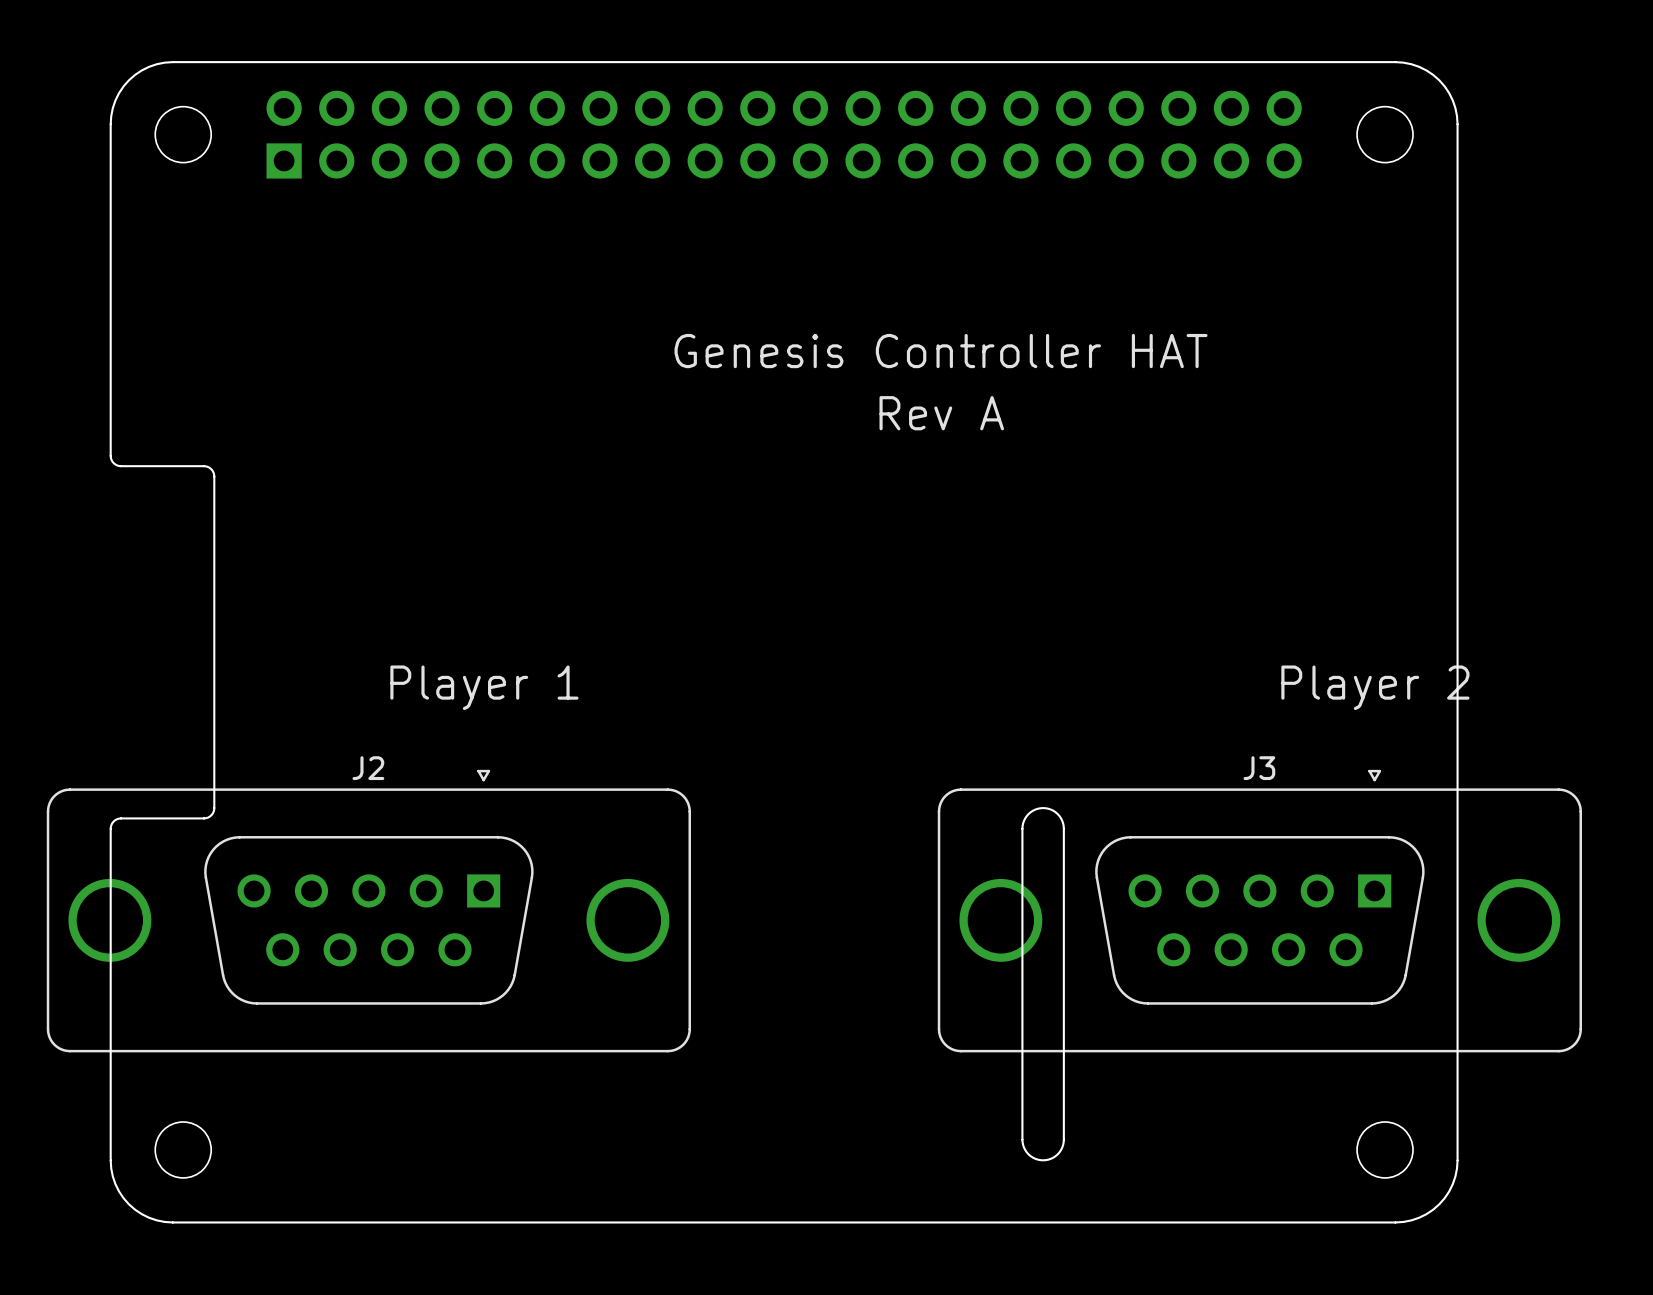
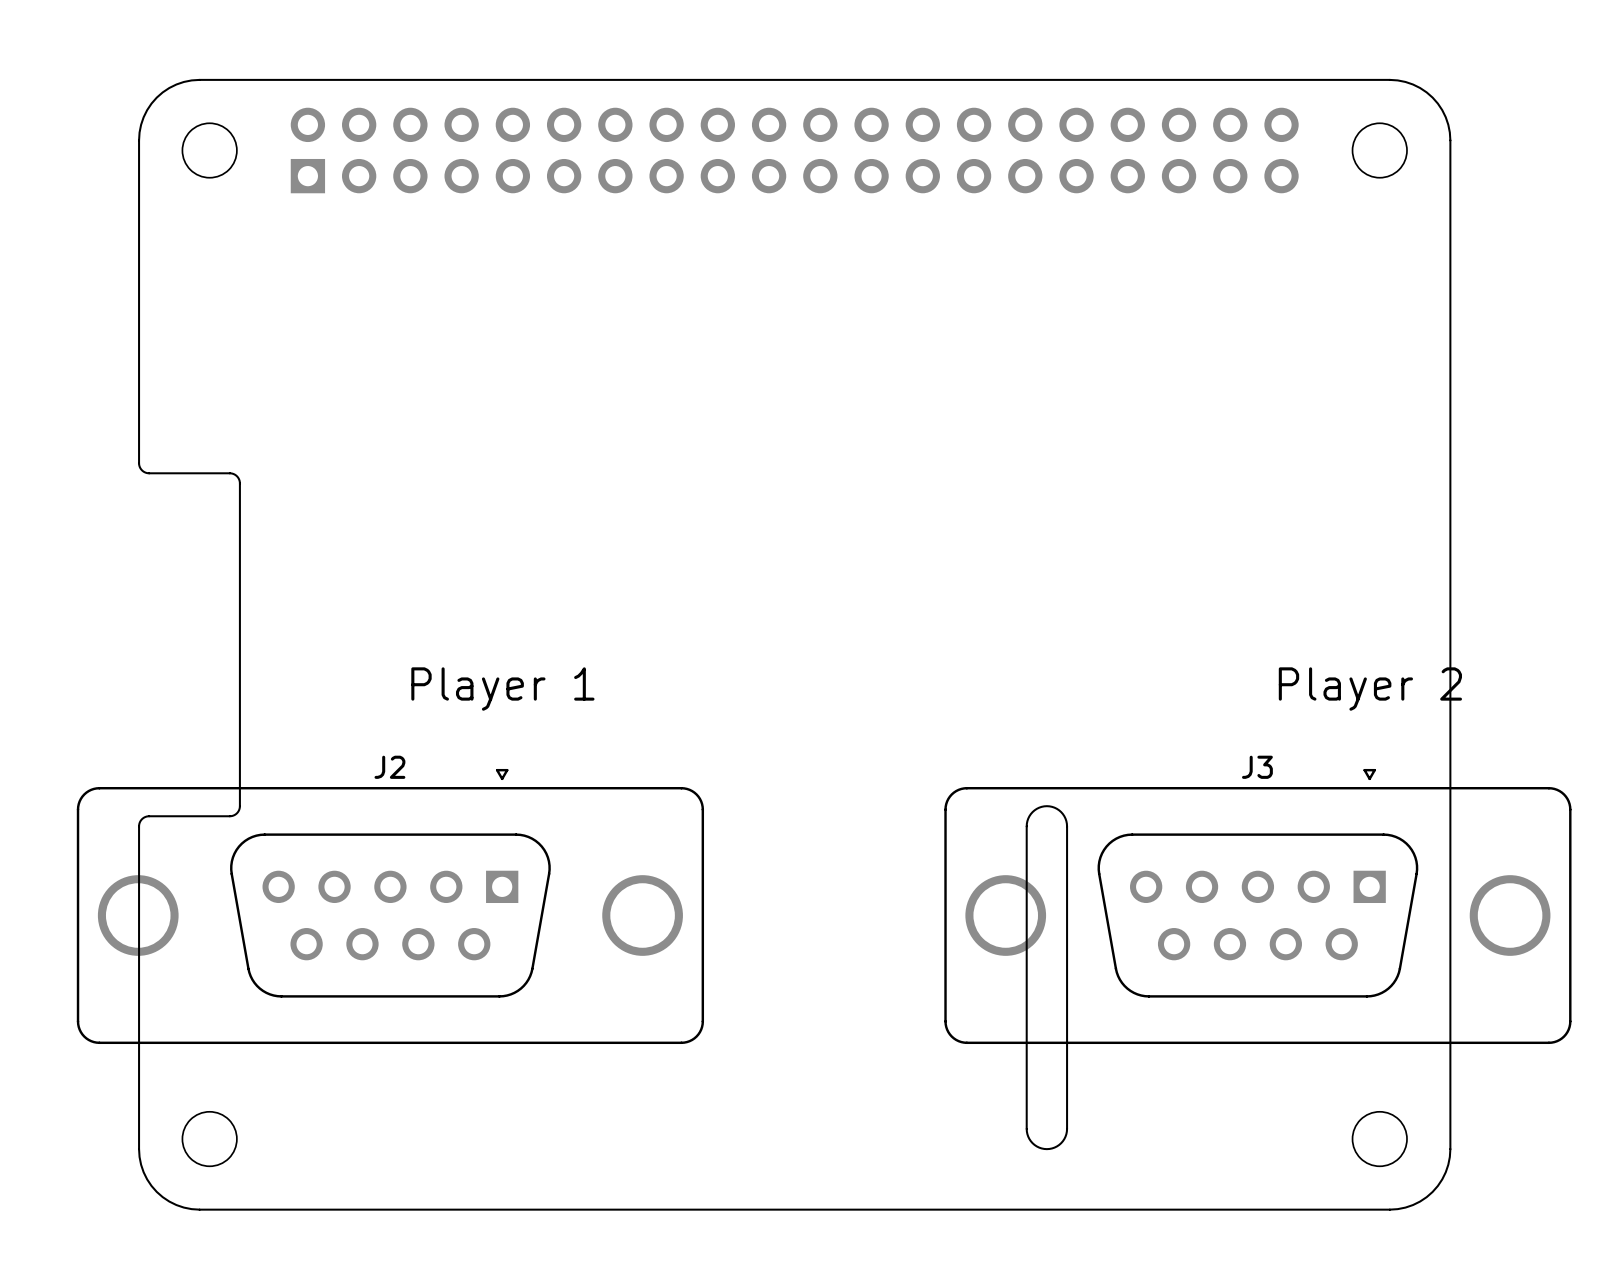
text: Genesis Controller HAT (941, 351) -> none
text: Rev A (941, 413) -> none

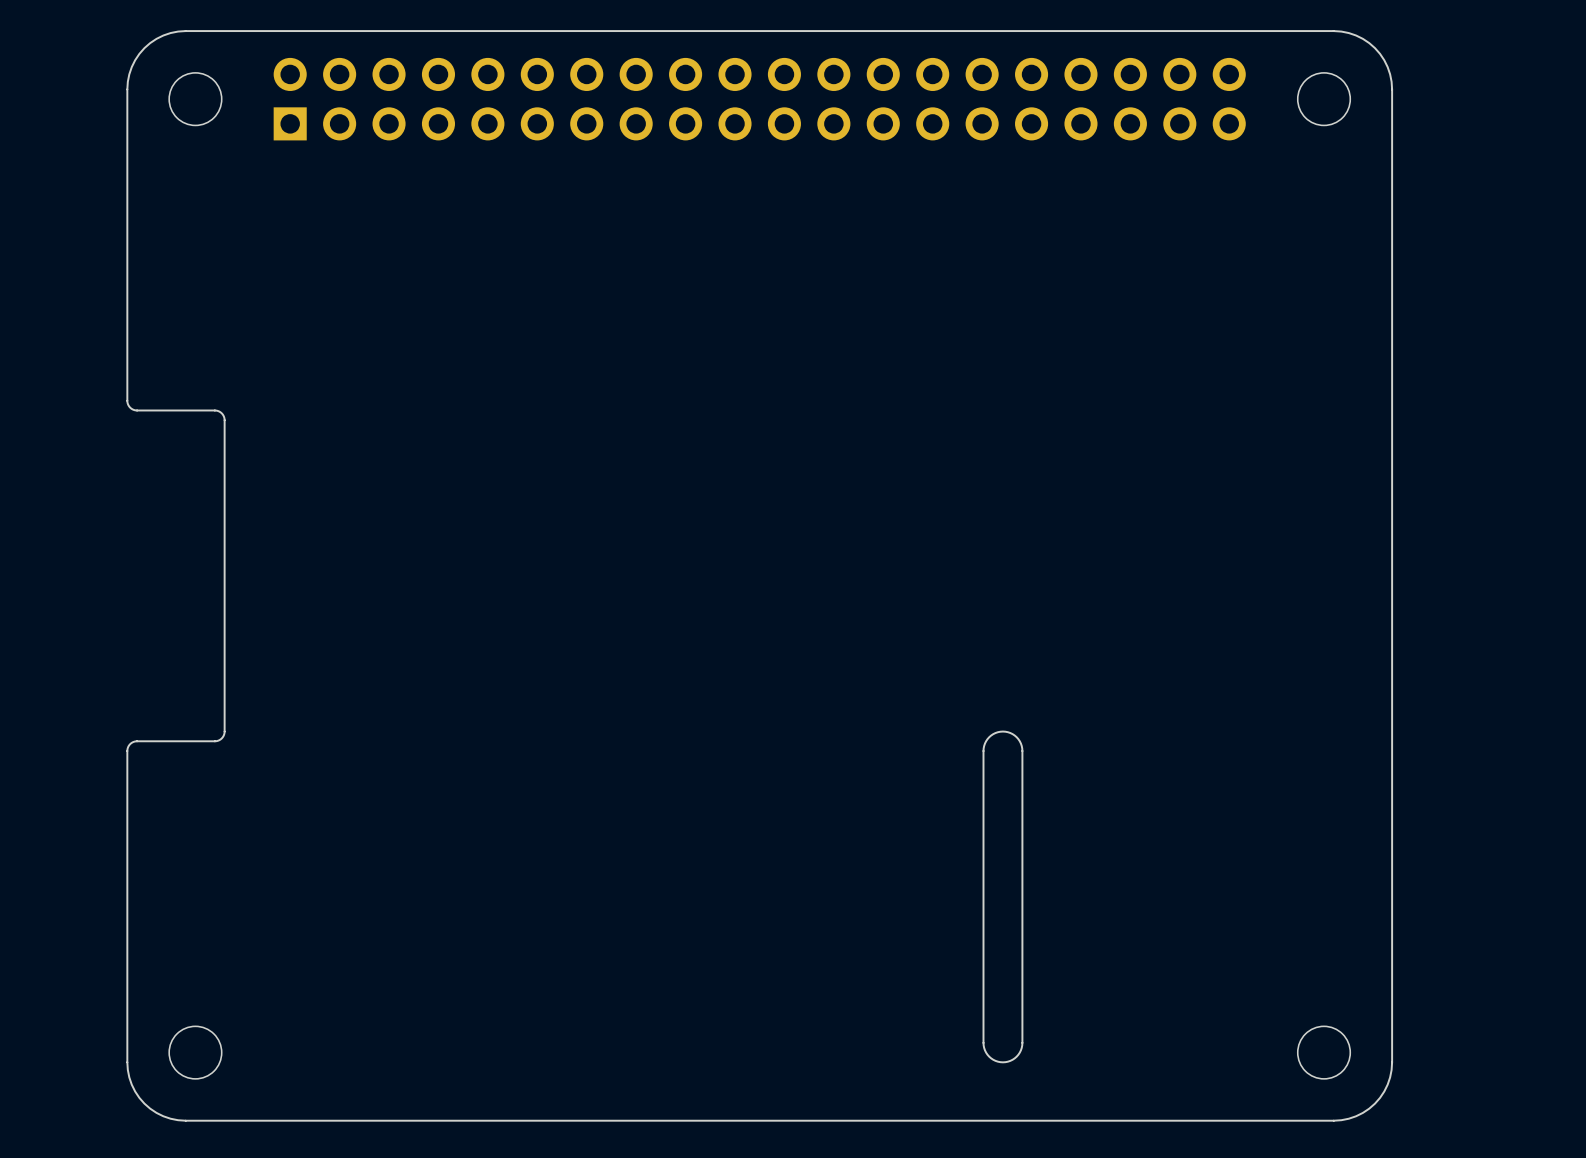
text: Player 1 (502, 689) -> none
text: Player 2 (1370, 689) -> none
J2: (390, 906) -> none
J3: (1257, 906) -> none

